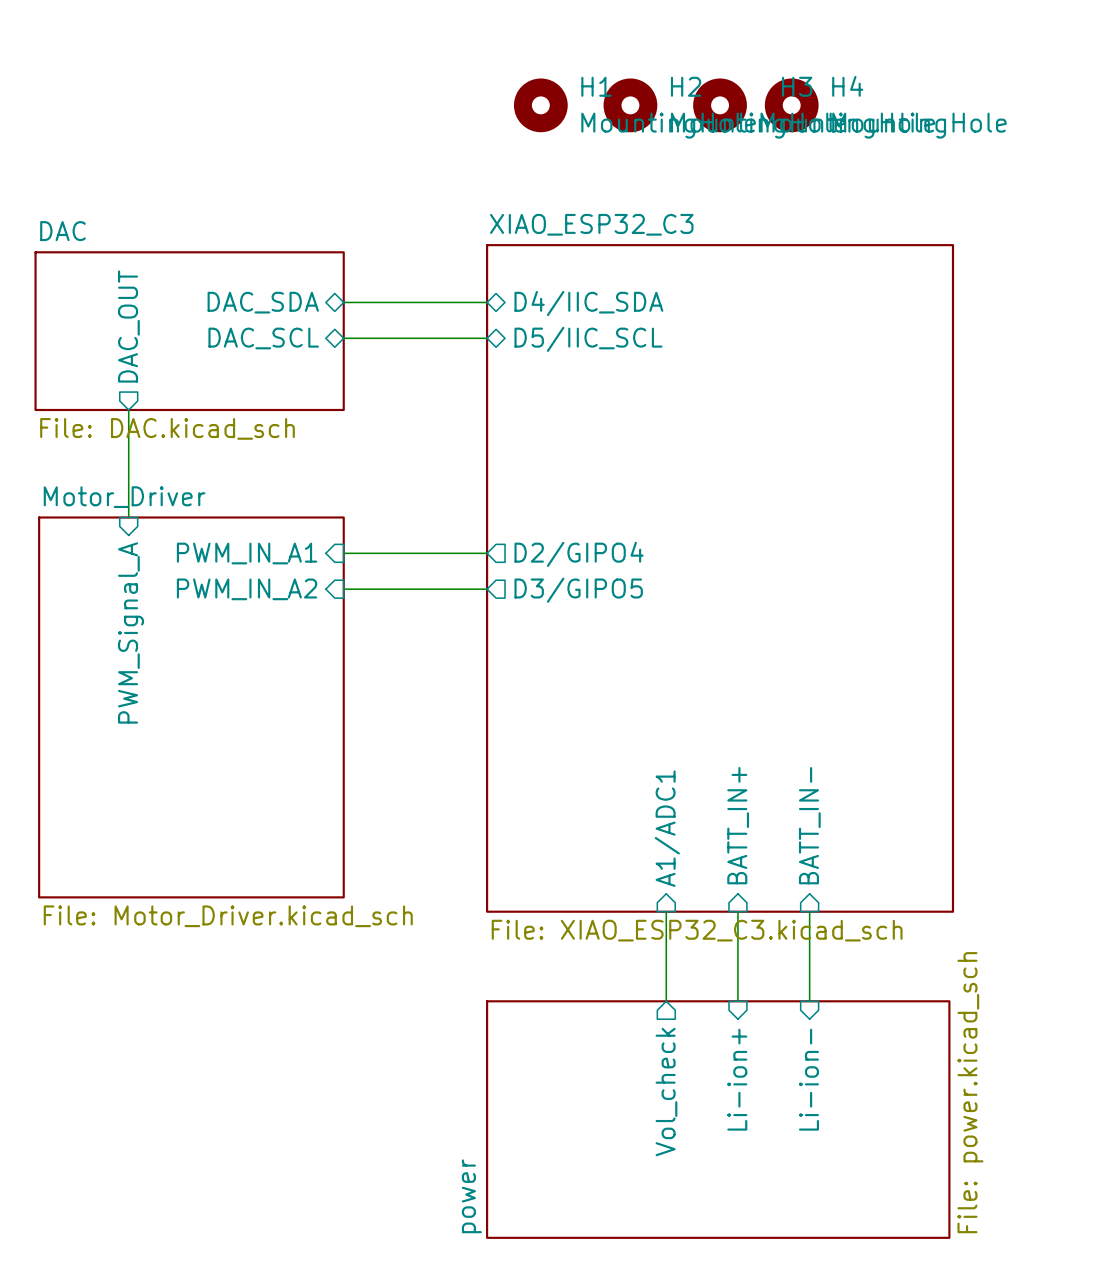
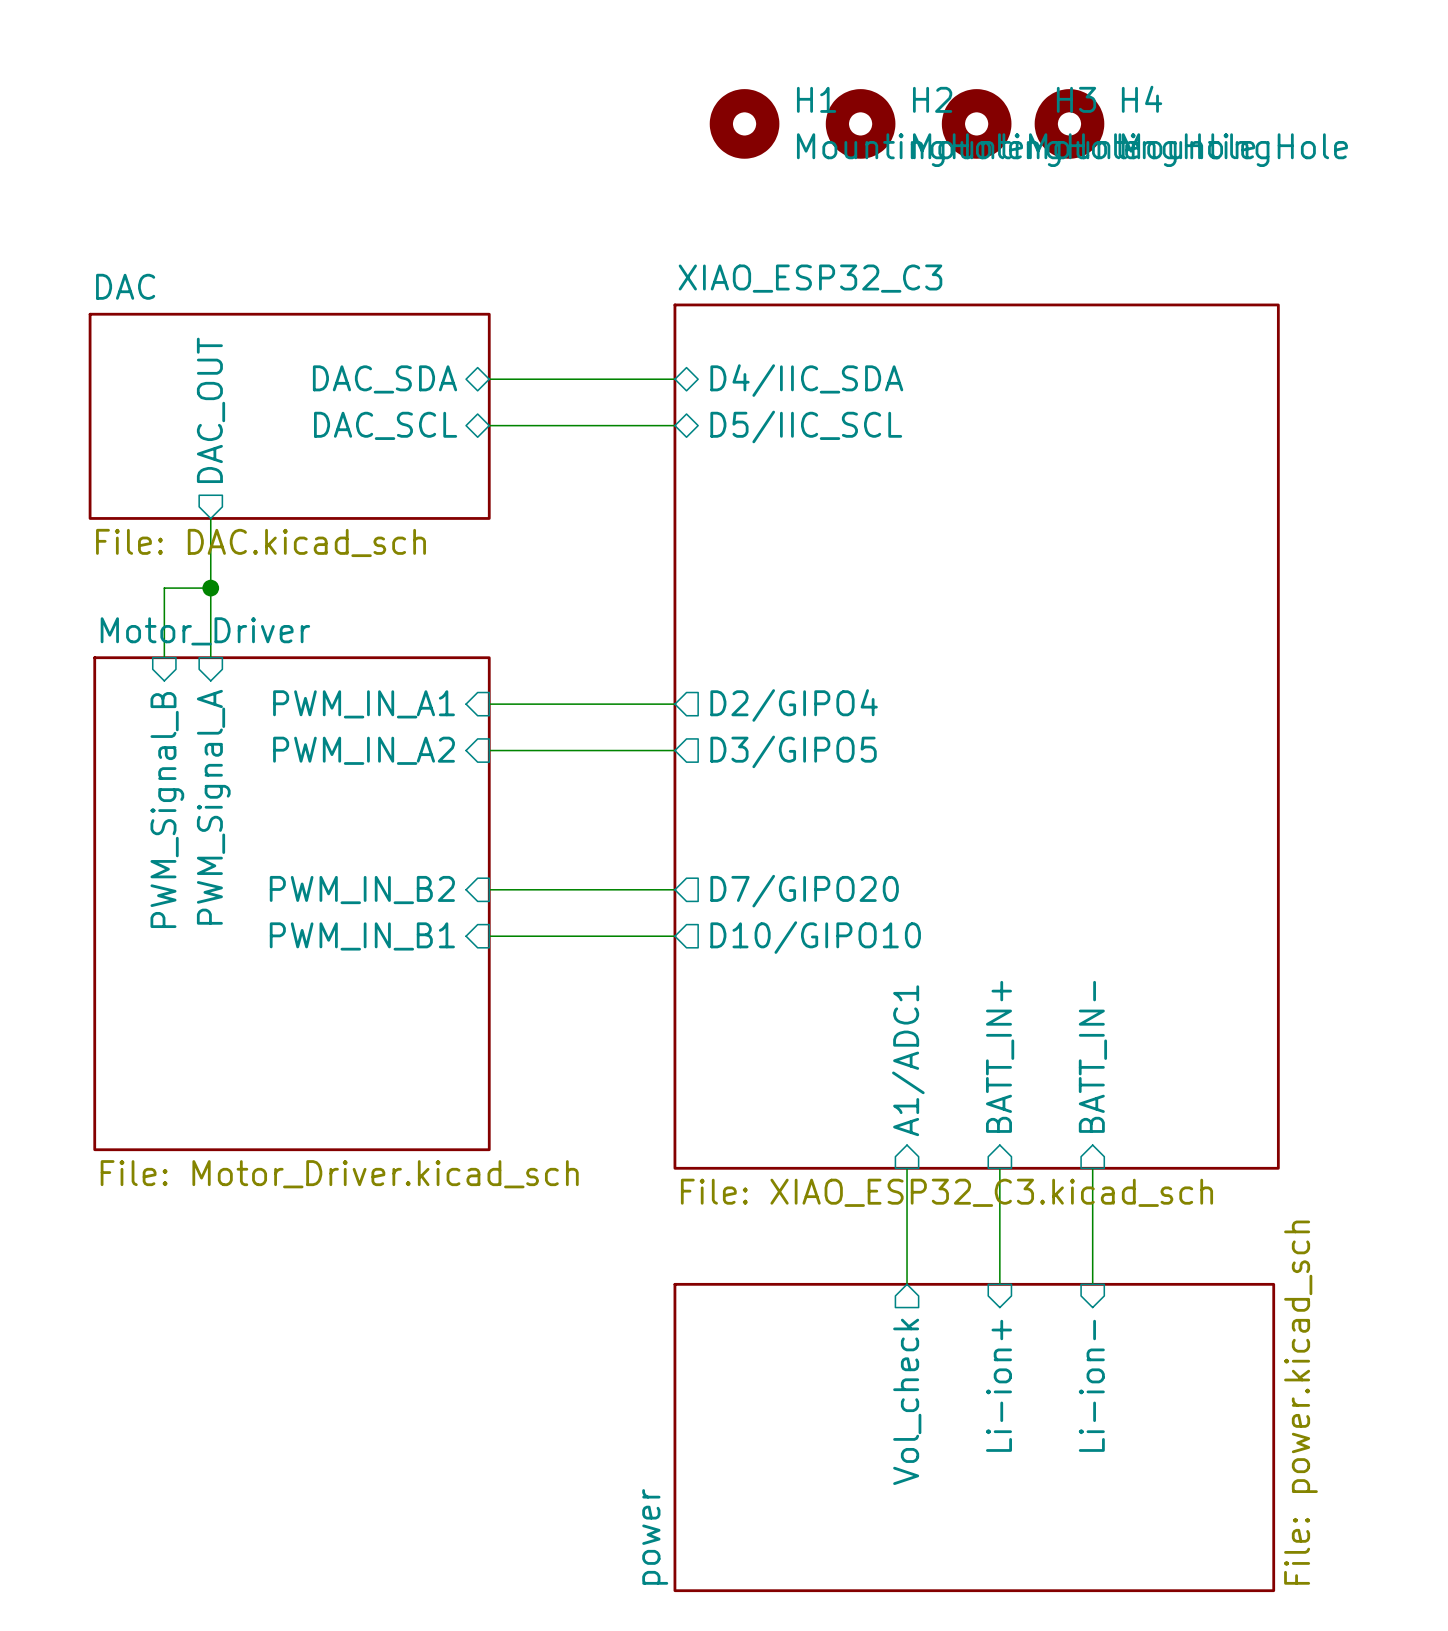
wire: none -> (210, 588) (164, 588) (164, 657)
junction: none -> (210, 588)
sheet pin: none -> PWM_Signal_B (167, 810)
sheet pin: none -> PWM_IN_B2 (362, 890)
wire: none -> (489, 889) (674, 889)
sheet pin: none -> D7/GIPO20 (804, 891)
sheet pin: none -> PWM_IN_B1 (362, 936)
wire: none -> (489, 936) (674, 936)
sheet pin: none -> D10/GIPO10 (815, 937)

